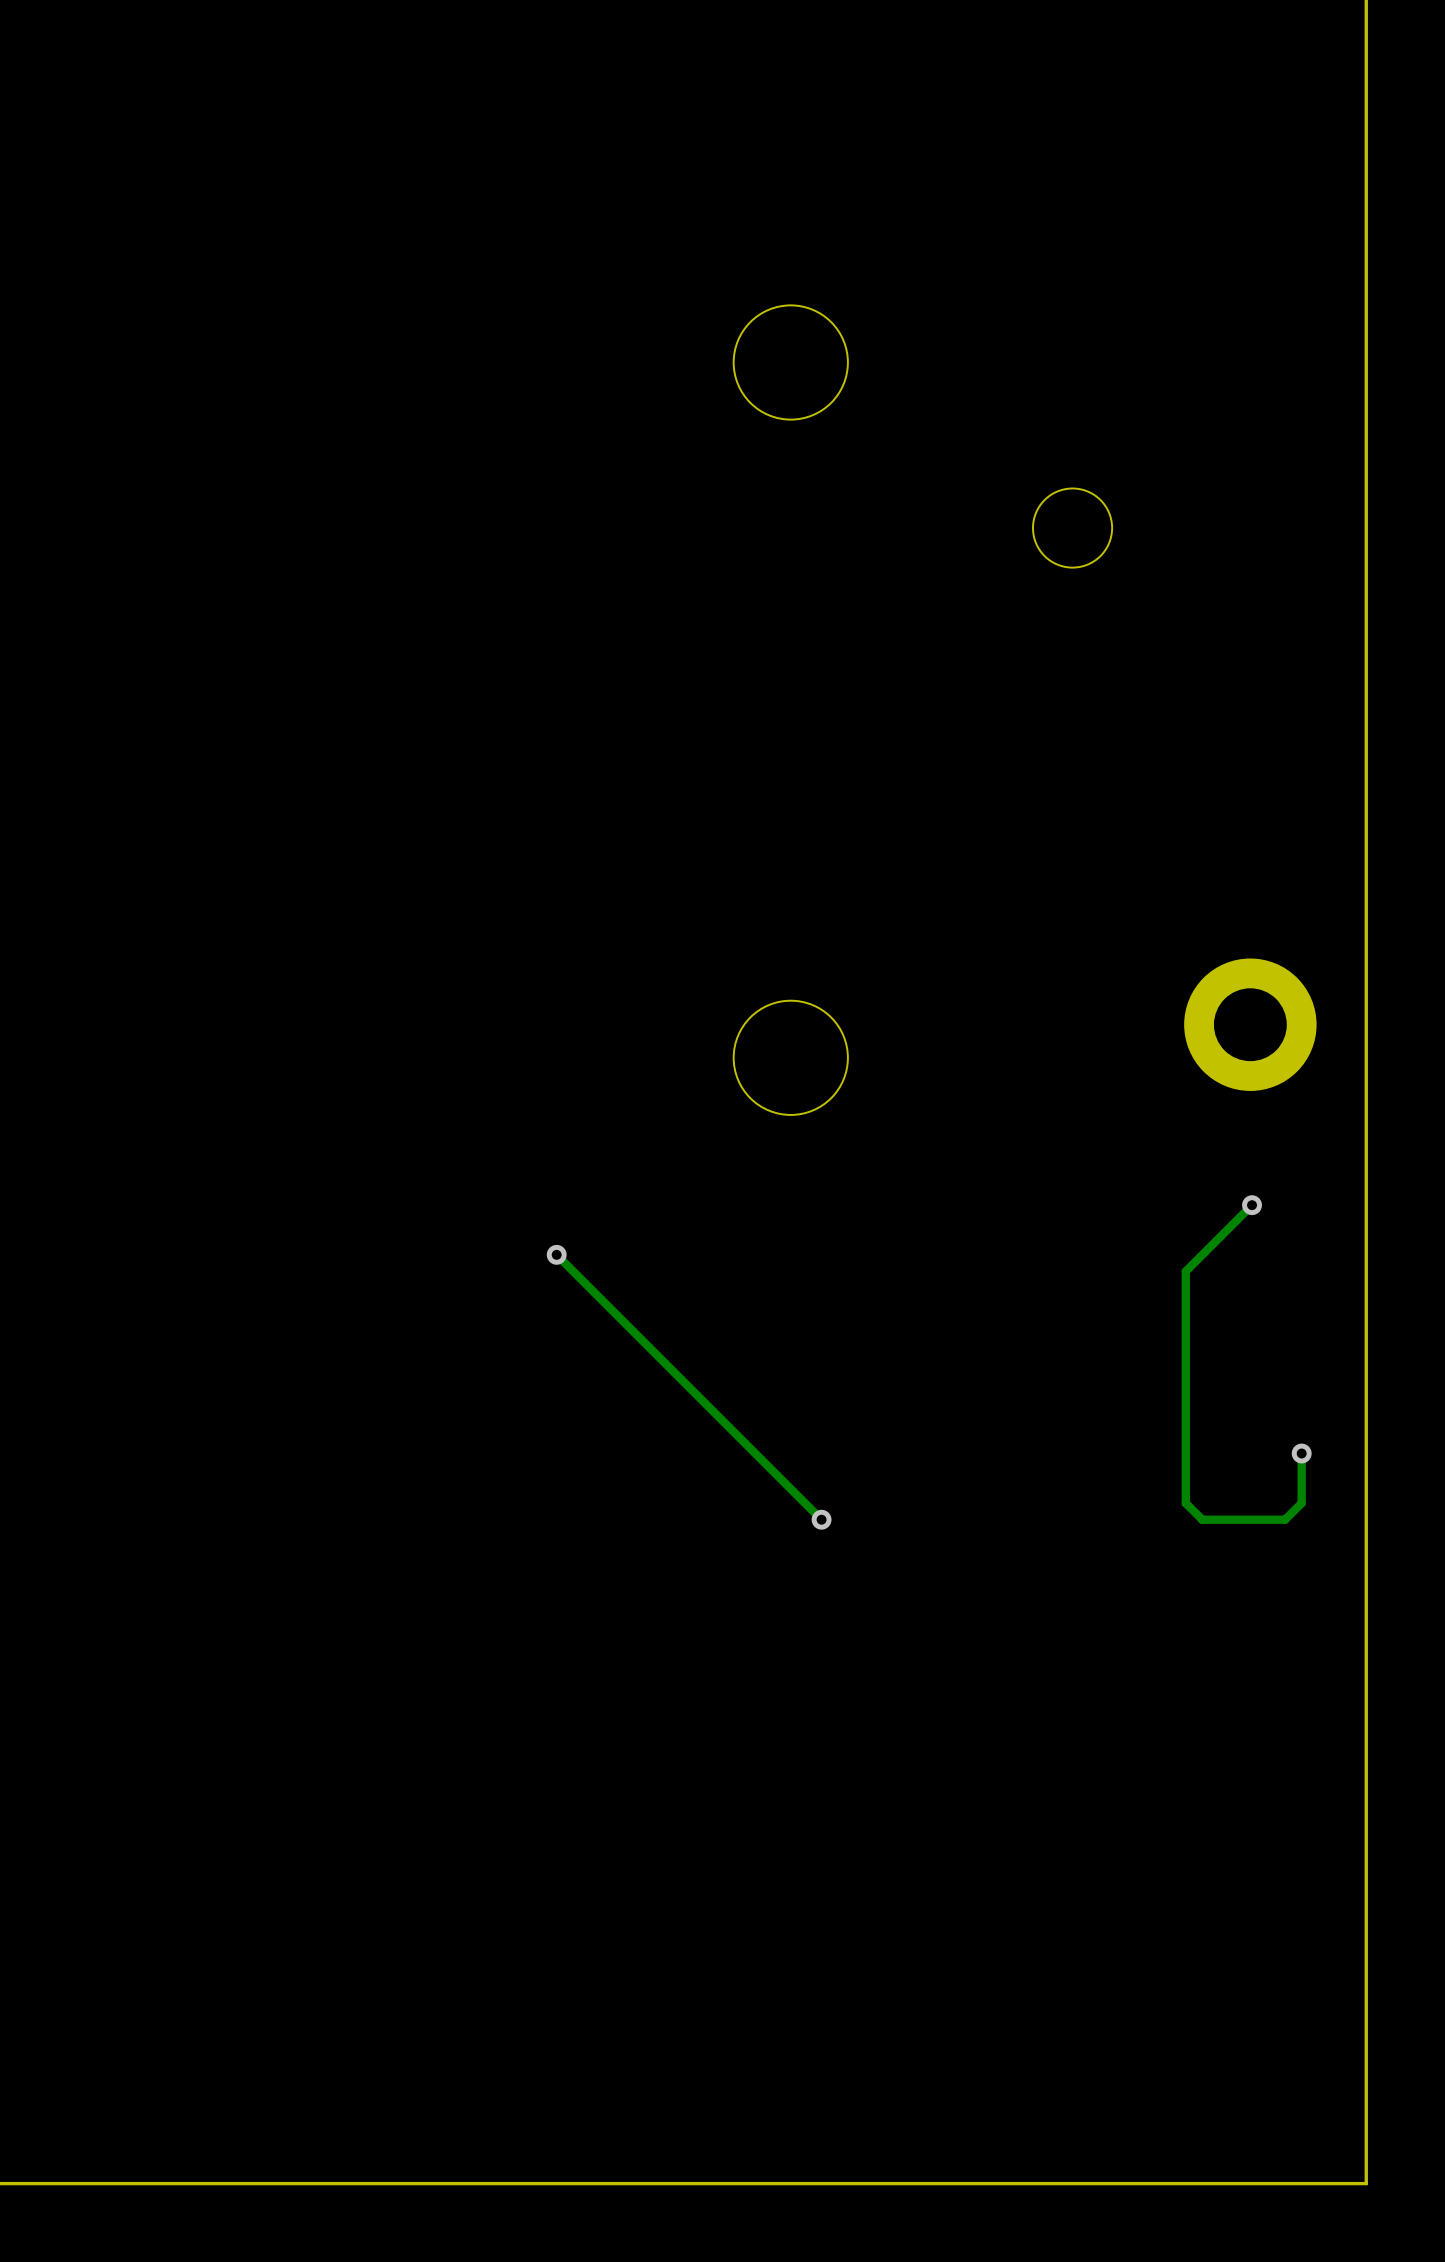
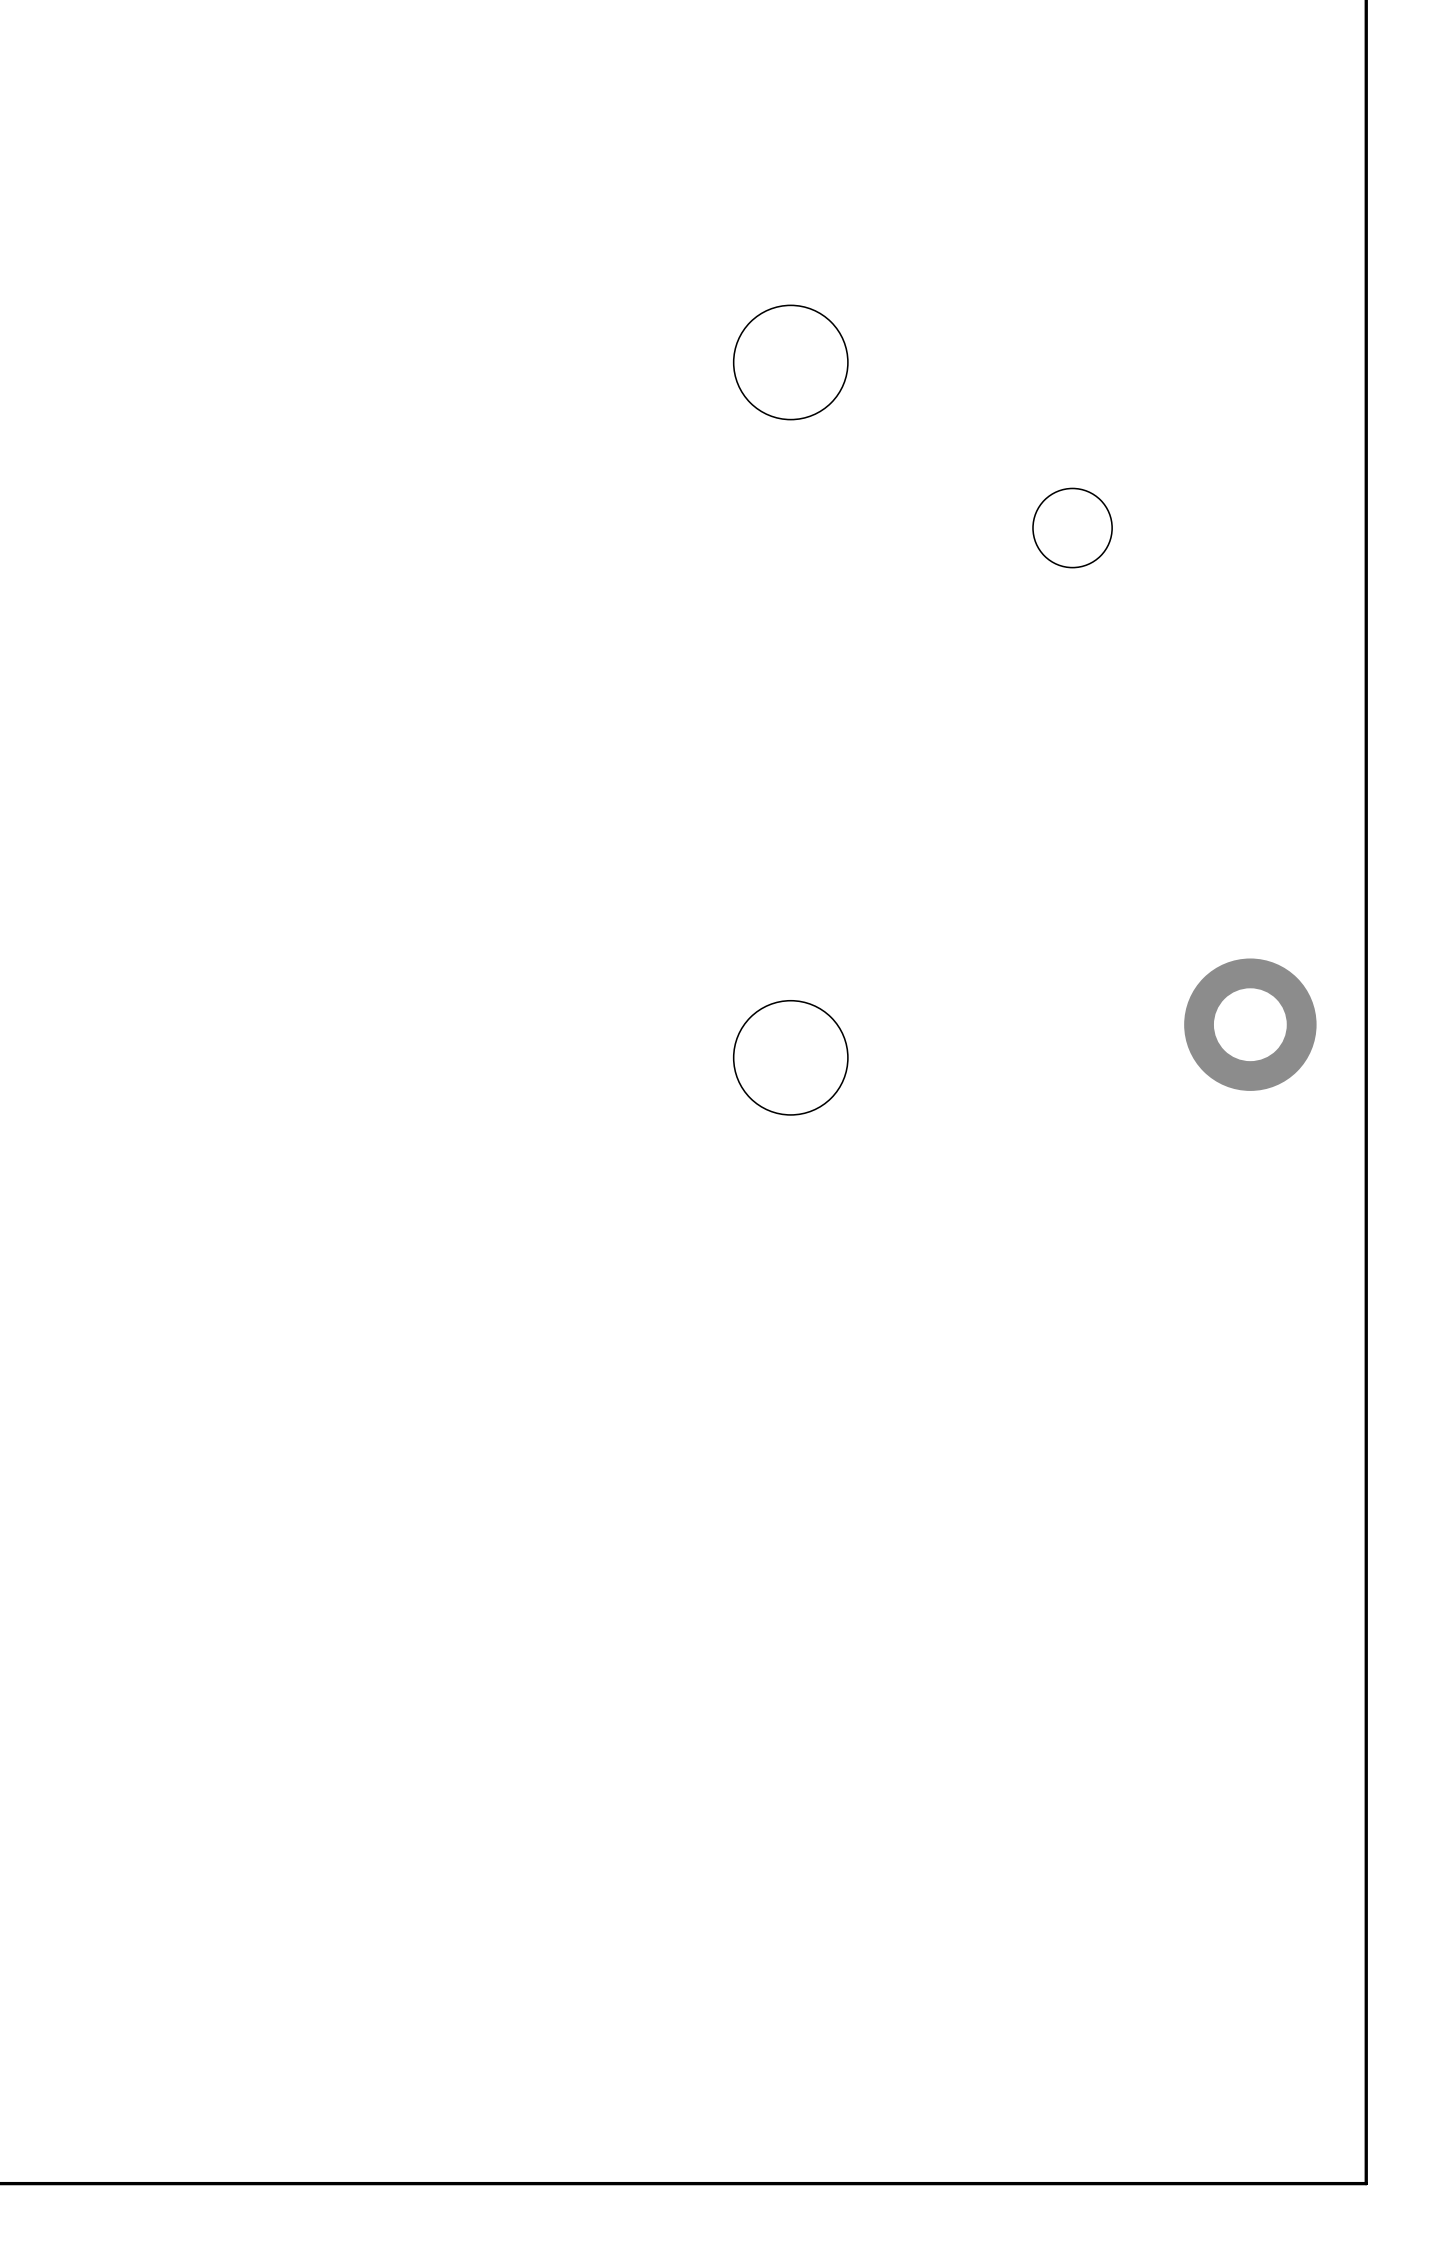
track: (1252, 1205) (1185, 1271) (1185, 1503) (1202, 1519) (1285, 1519) (1301, 1503) (1301, 1453) -> none
via: (1252, 1205) -> none
track: (556, 1254) (821, 1519) -> none
via: (556, 1254) -> none
via: (1301, 1453) -> none
via: (821, 1519) -> none

